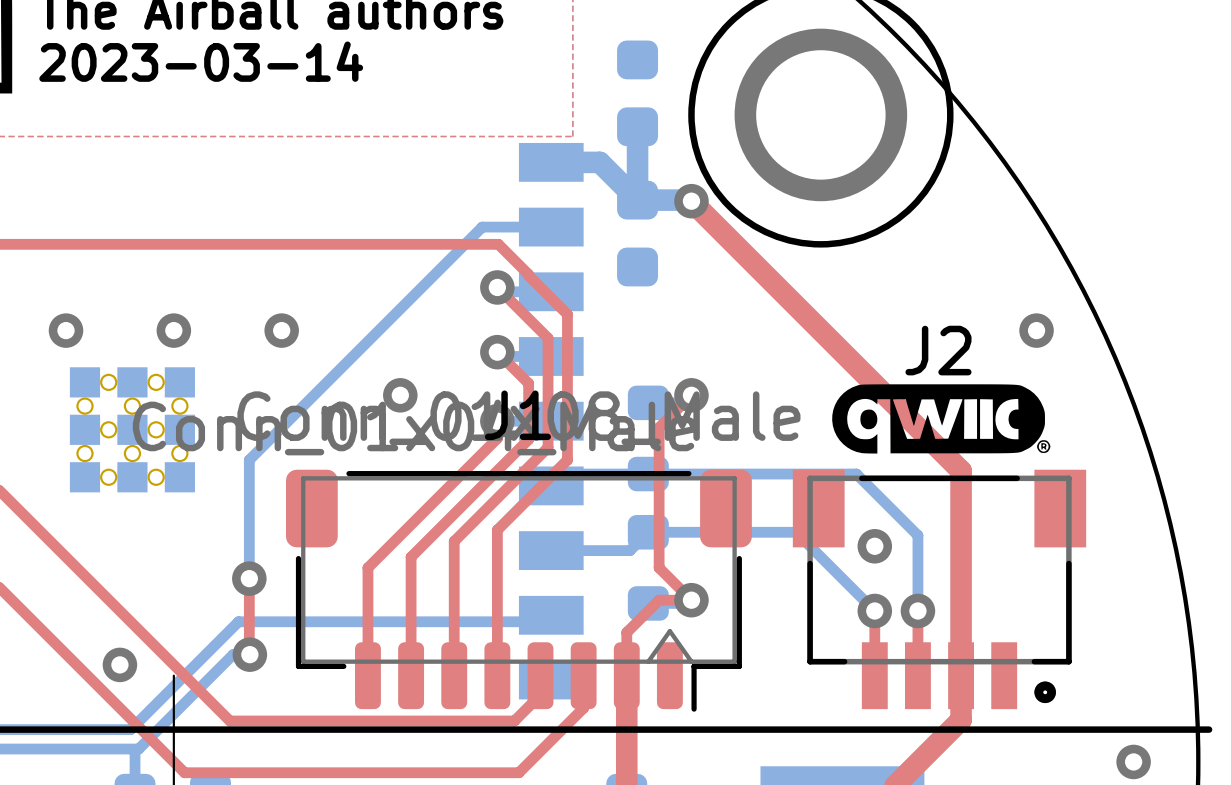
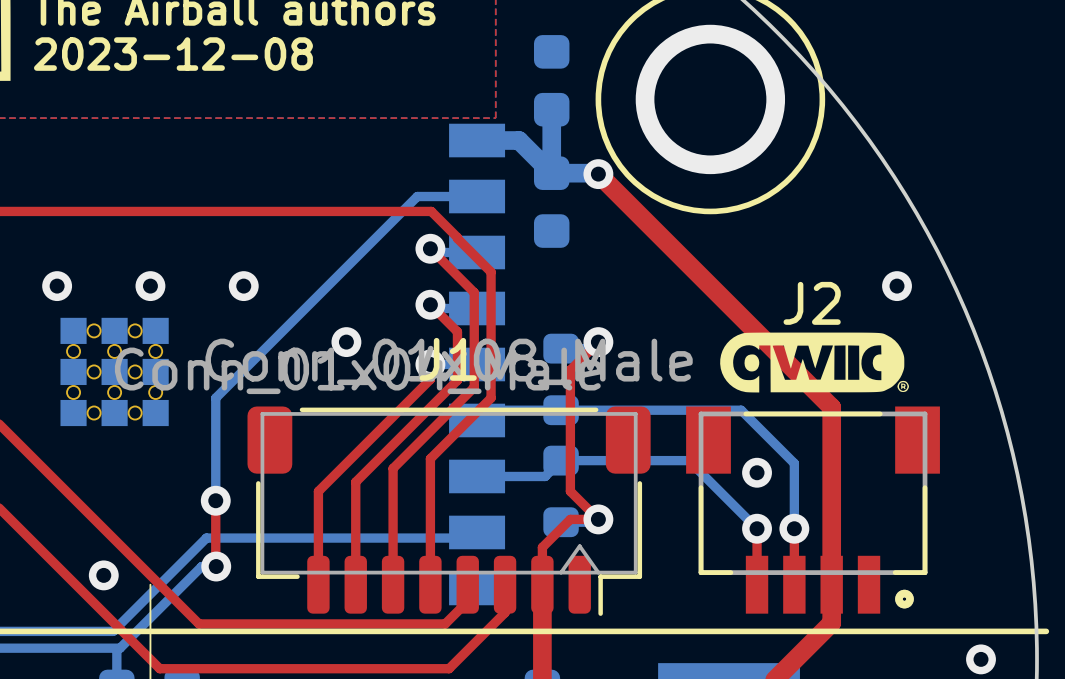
text: 2023-03-14 (201, 61) -> 2023-12-08 (173, 54)

